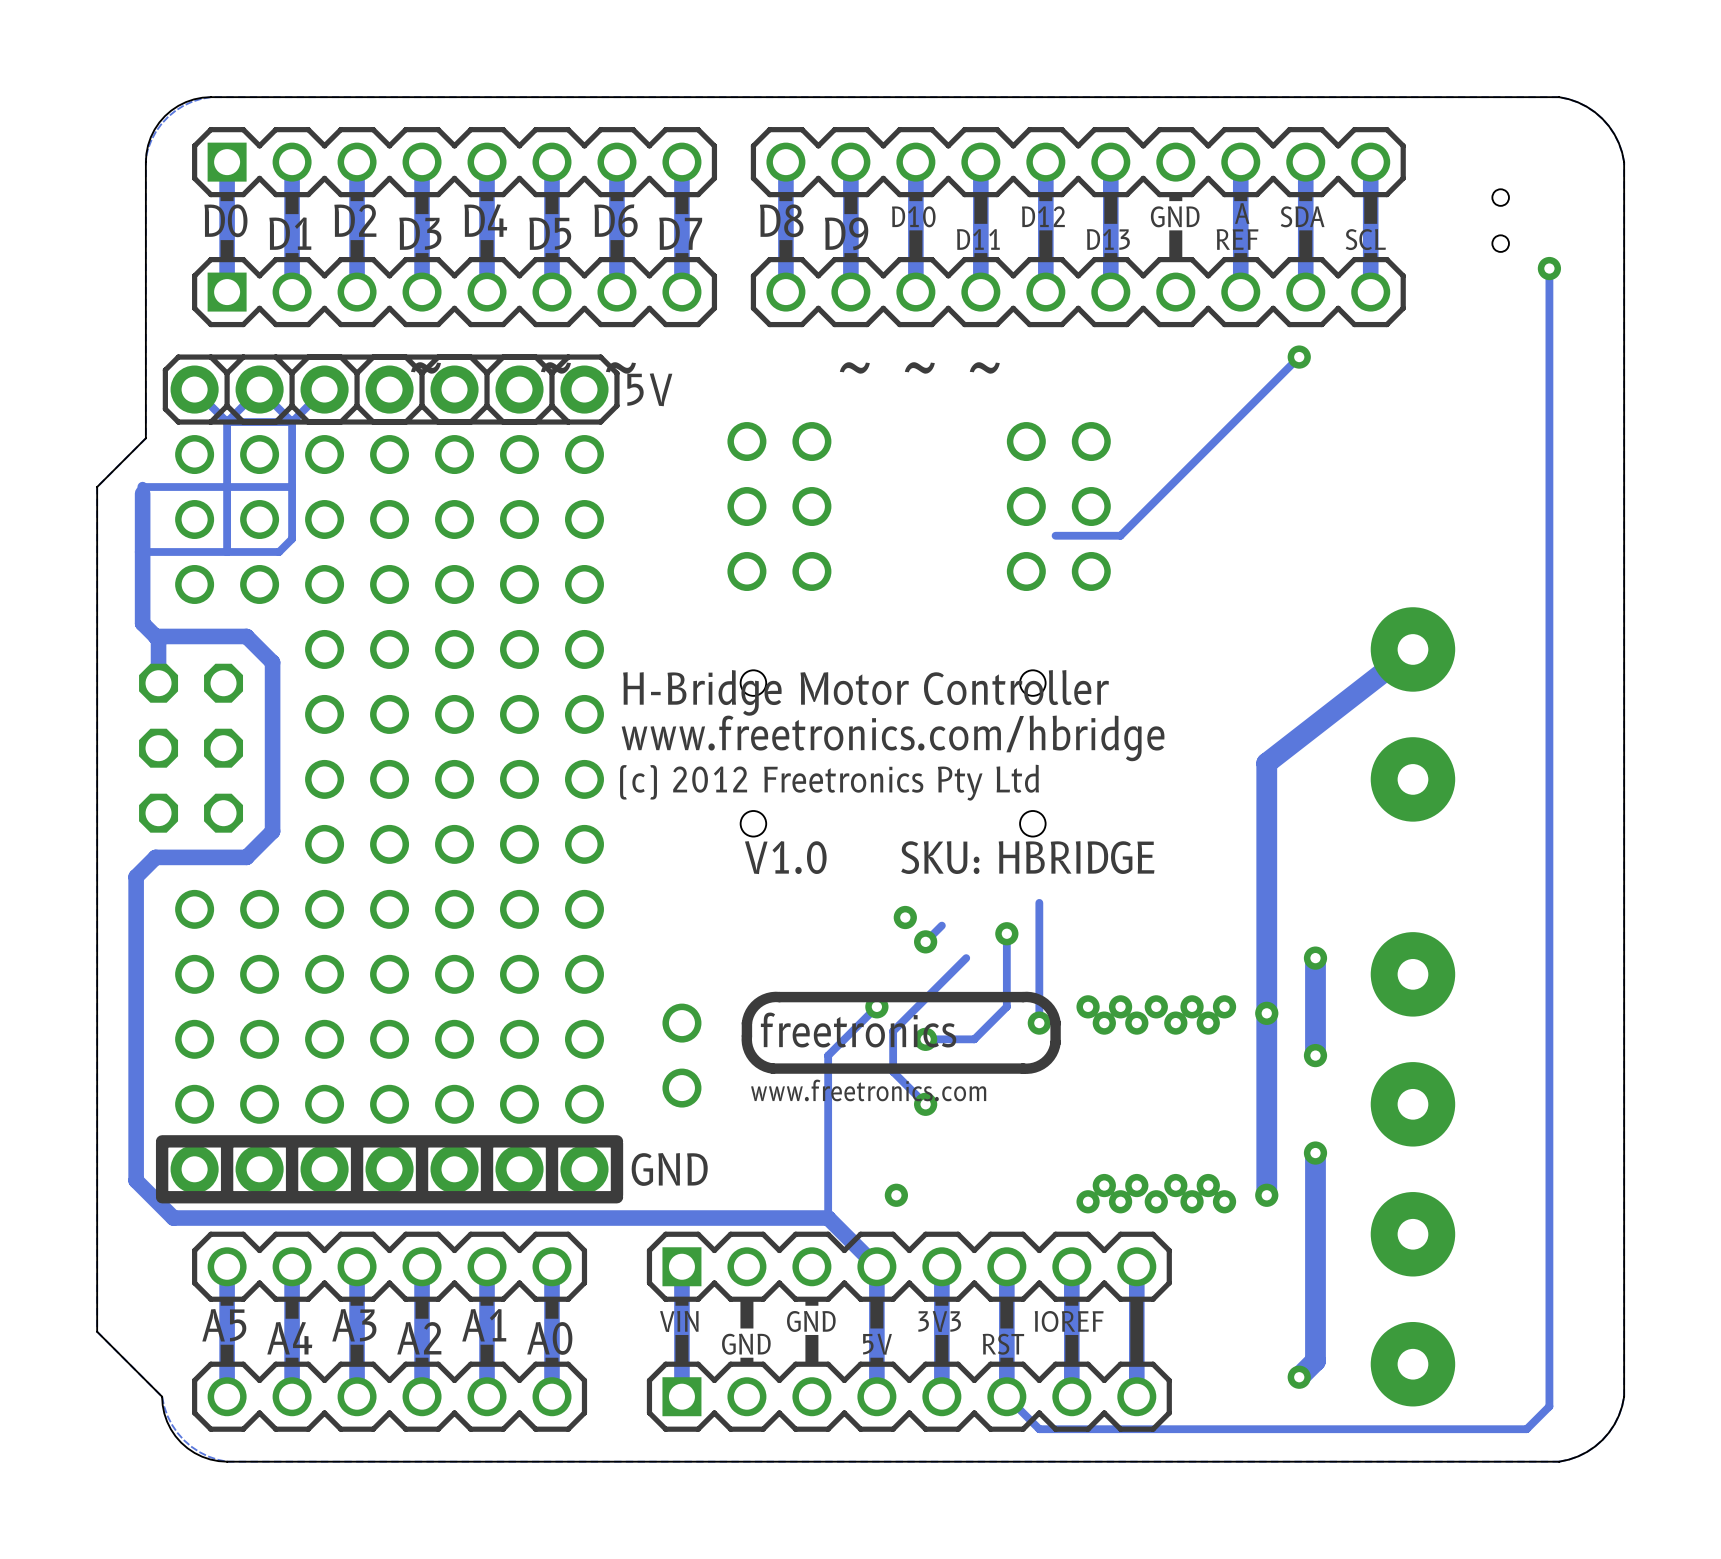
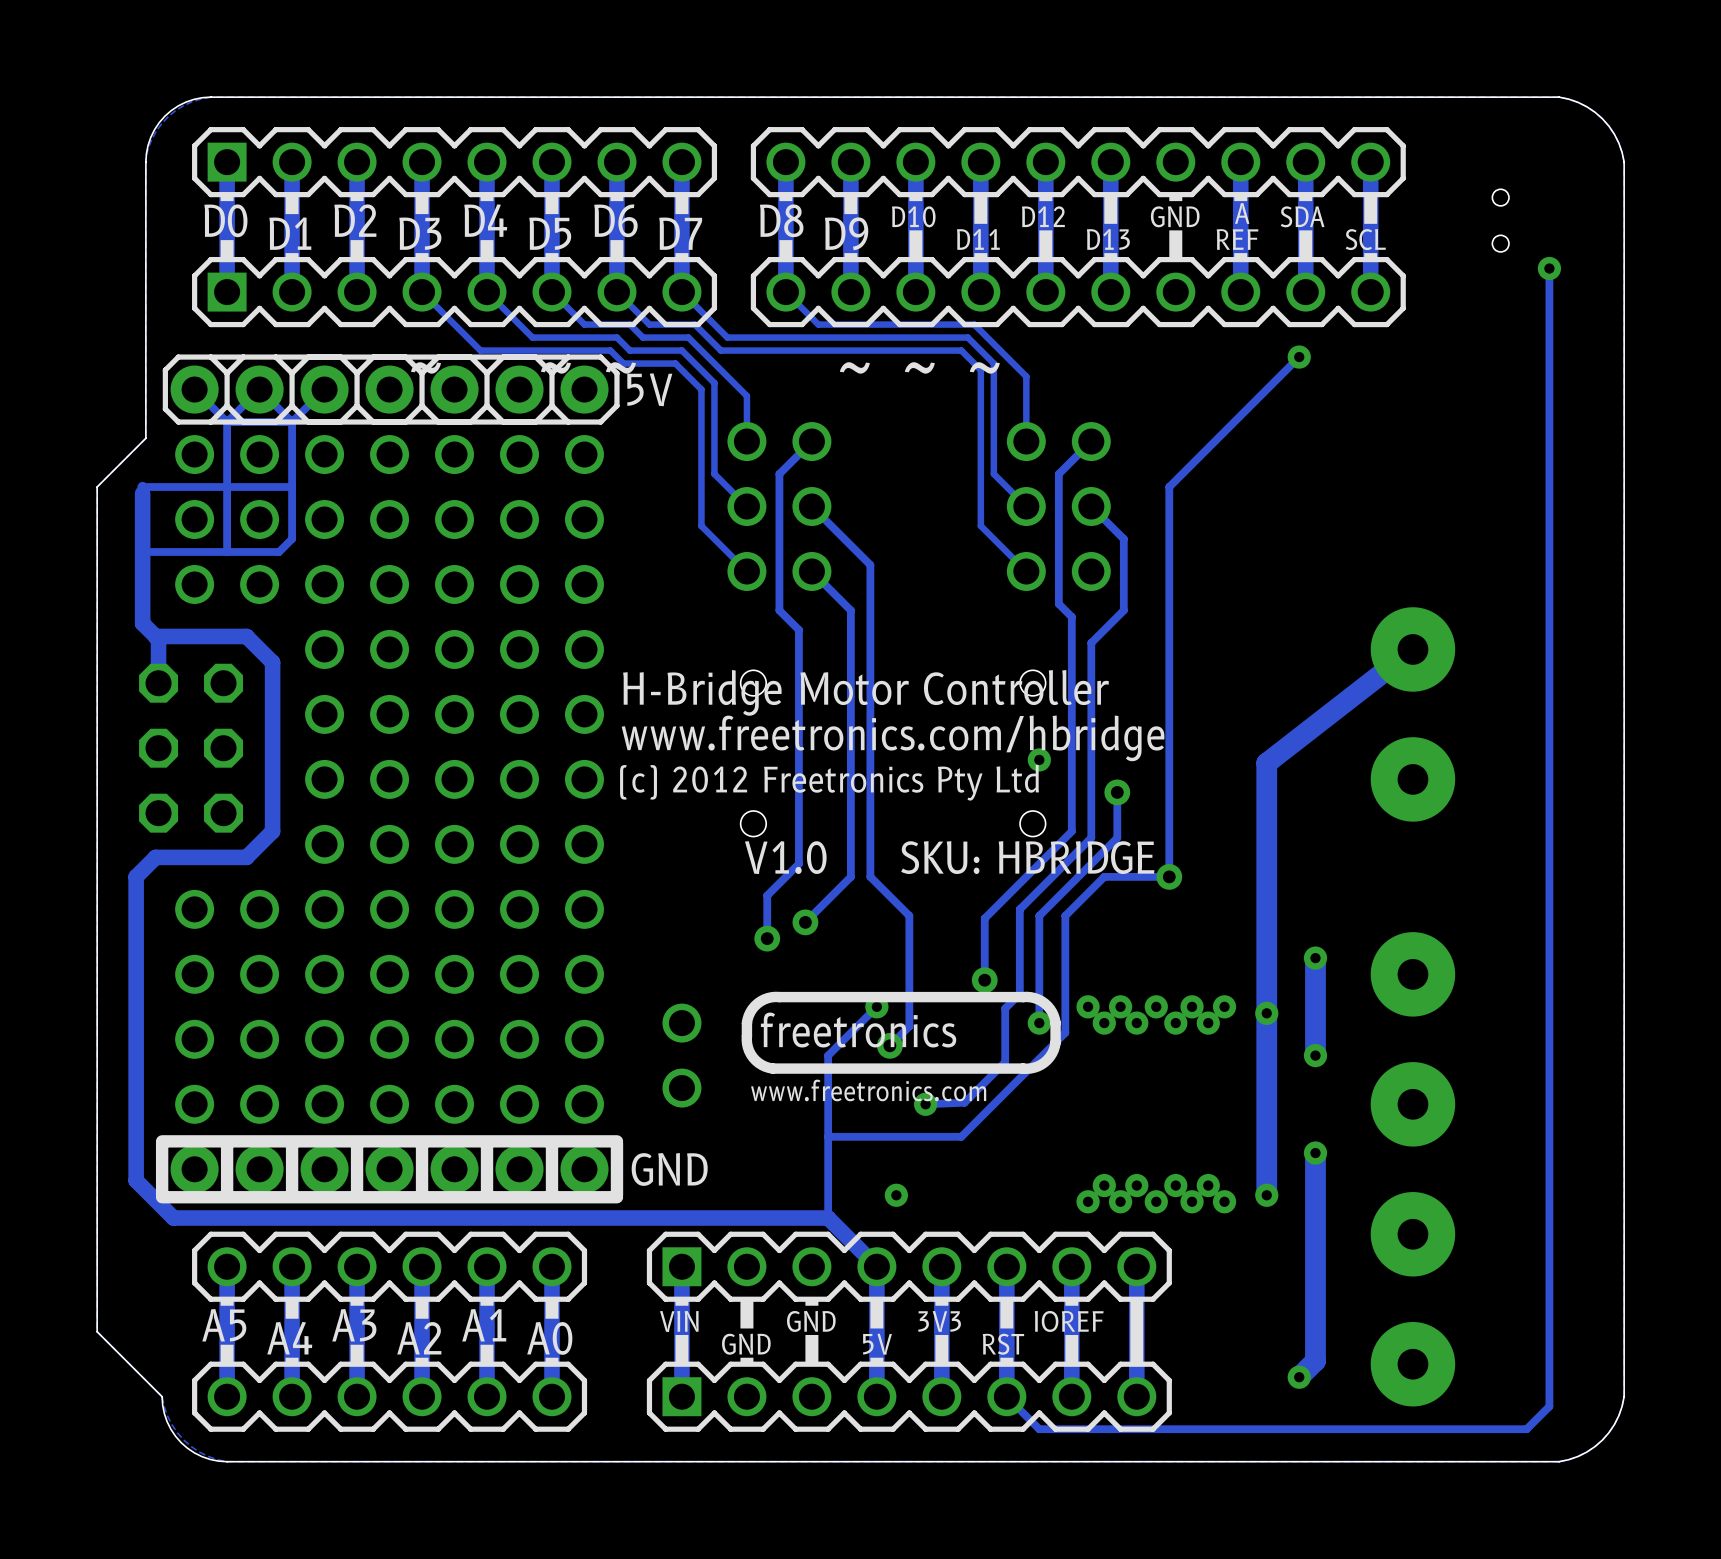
track: none -> (422, 292) (480, 350) (610, 350) (623, 363) (675, 363) (701, 389) (701, 526) (746, 571)
track: none -> (487, 292) (532, 337) (616, 337) (629, 350) (681, 350) (714, 383) (714, 474) (746, 506)
track: none -> (551, 292) (584, 324) (629, 324) (642, 337) (688, 337) (746, 396) (746, 441)
track: none -> (616, 292) (649, 324) (694, 324) (720, 350) (961, 350) (980, 370) (980, 526) (1026, 571)
track: none -> (681, 292) (727, 337) (967, 337) (993, 363) (993, 474) (1026, 506)
track: none -> (785, 292) (818, 324) (974, 324) (1026, 376) (1026, 441)
track: none -> (811, 441) (779, 474) (779, 610) (798, 629) (798, 863) (767, 895) (767, 938)
track: none -> (1091, 441) (1058, 474) (1058, 603) (1071, 616) (1071, 831) (984, 918) (984, 980)
track: (1169, 487) (1120, 535) (1055, 535) -> (1169, 487) (1169, 876) (1104, 876) (1065, 915) (1065, 1032) (961, 1136) (828, 1136)
track: none -> (811, 506) (870, 564) (870, 876) (909, 915) (909, 1026) (889, 1045)
track: none -> (811, 571) (850, 610) (850, 876) (805, 922)
via: none -> (1039, 759)
via: none -> (1117, 792)
via: none -> (1169, 876)
track: (1039, 902) (1039, 915) -> (1117, 792) (1117, 837) (1039, 915)
via: (905, 917) -> none
via: none -> (805, 922)
track: (941, 925) (925, 941) -> none
track: (1006, 933) (1006, 1006) -> (1091, 506) (1123, 539) (1123, 610) (1091, 642) (1091, 837) (1019, 909) (1019, 993) (1006, 1006)
via: (1006, 933) -> none
via: none -> (767, 938)
via: (925, 941) -> none
track: (966, 958) (893, 1031) (893, 1071) (925, 1104) -> (1005, 1008) (1005, 1062) (964, 1102) (925, 1104)
via: none -> (984, 980)
track: (1005, 1008) (974, 1039) (925, 1039) -> none
via: (925, 1039) -> none
via: none -> (889, 1045)

